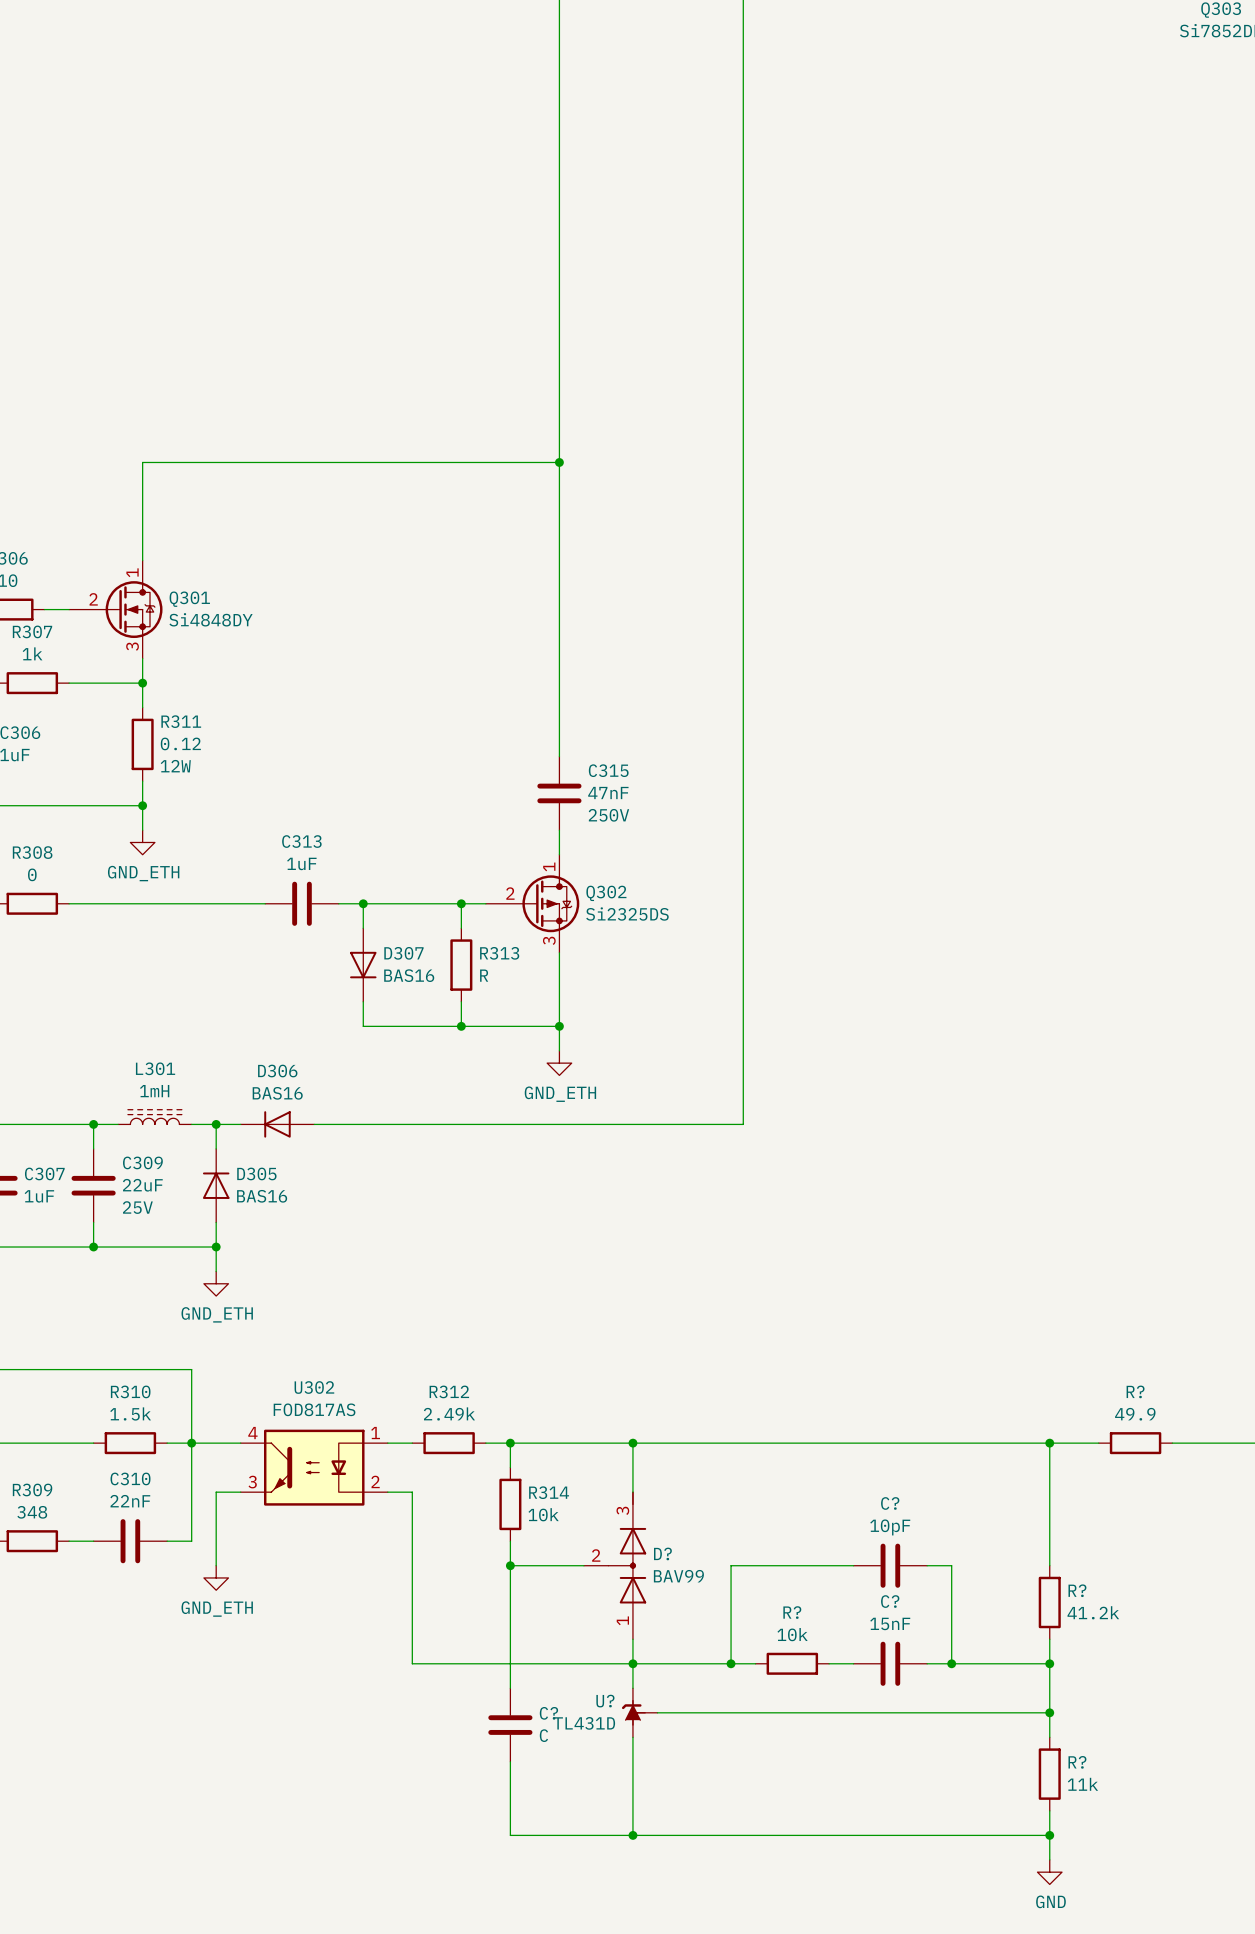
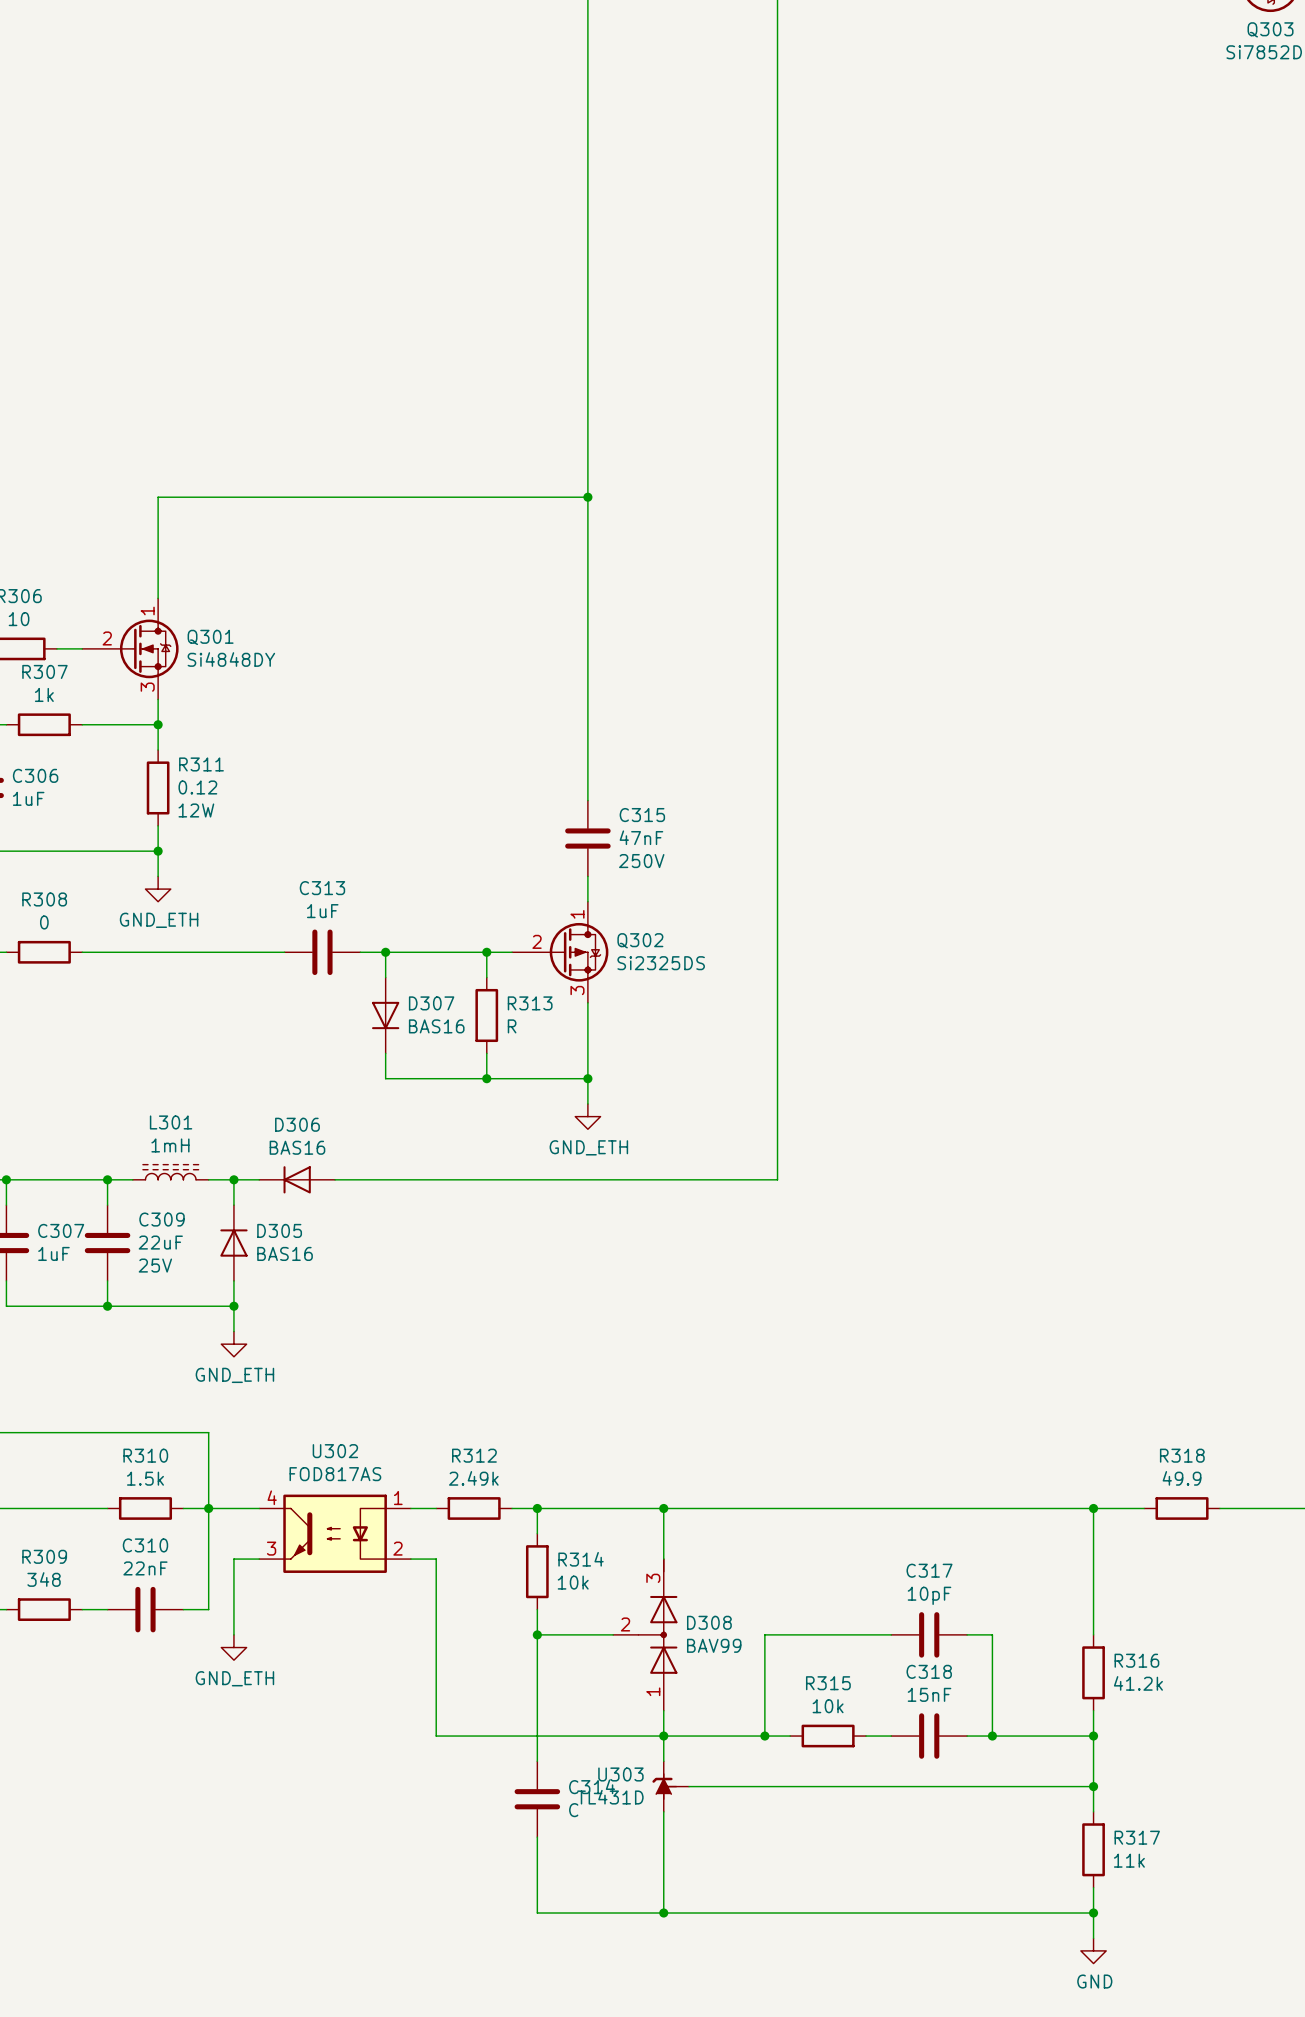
R? name: R? (1135, 1391) -> R318 (1182, 1455)
C? name: C? (890, 1503) -> C317 (929, 1570)
D? name: D? (662, 1553) -> D308 (709, 1622)
R? name: R? (1077, 1590) -> R316 (1136, 1660)
C? name: C? (890, 1601) -> C318 (929, 1671)
R? name: R? (792, 1612) -> R315 (828, 1683)
U? name: U? (605, 1701) -> U303 (620, 1774)
C? name: C? (548, 1713) -> C314 (592, 1786)
R? name: R? (1077, 1762) -> R317 (1137, 1837)

